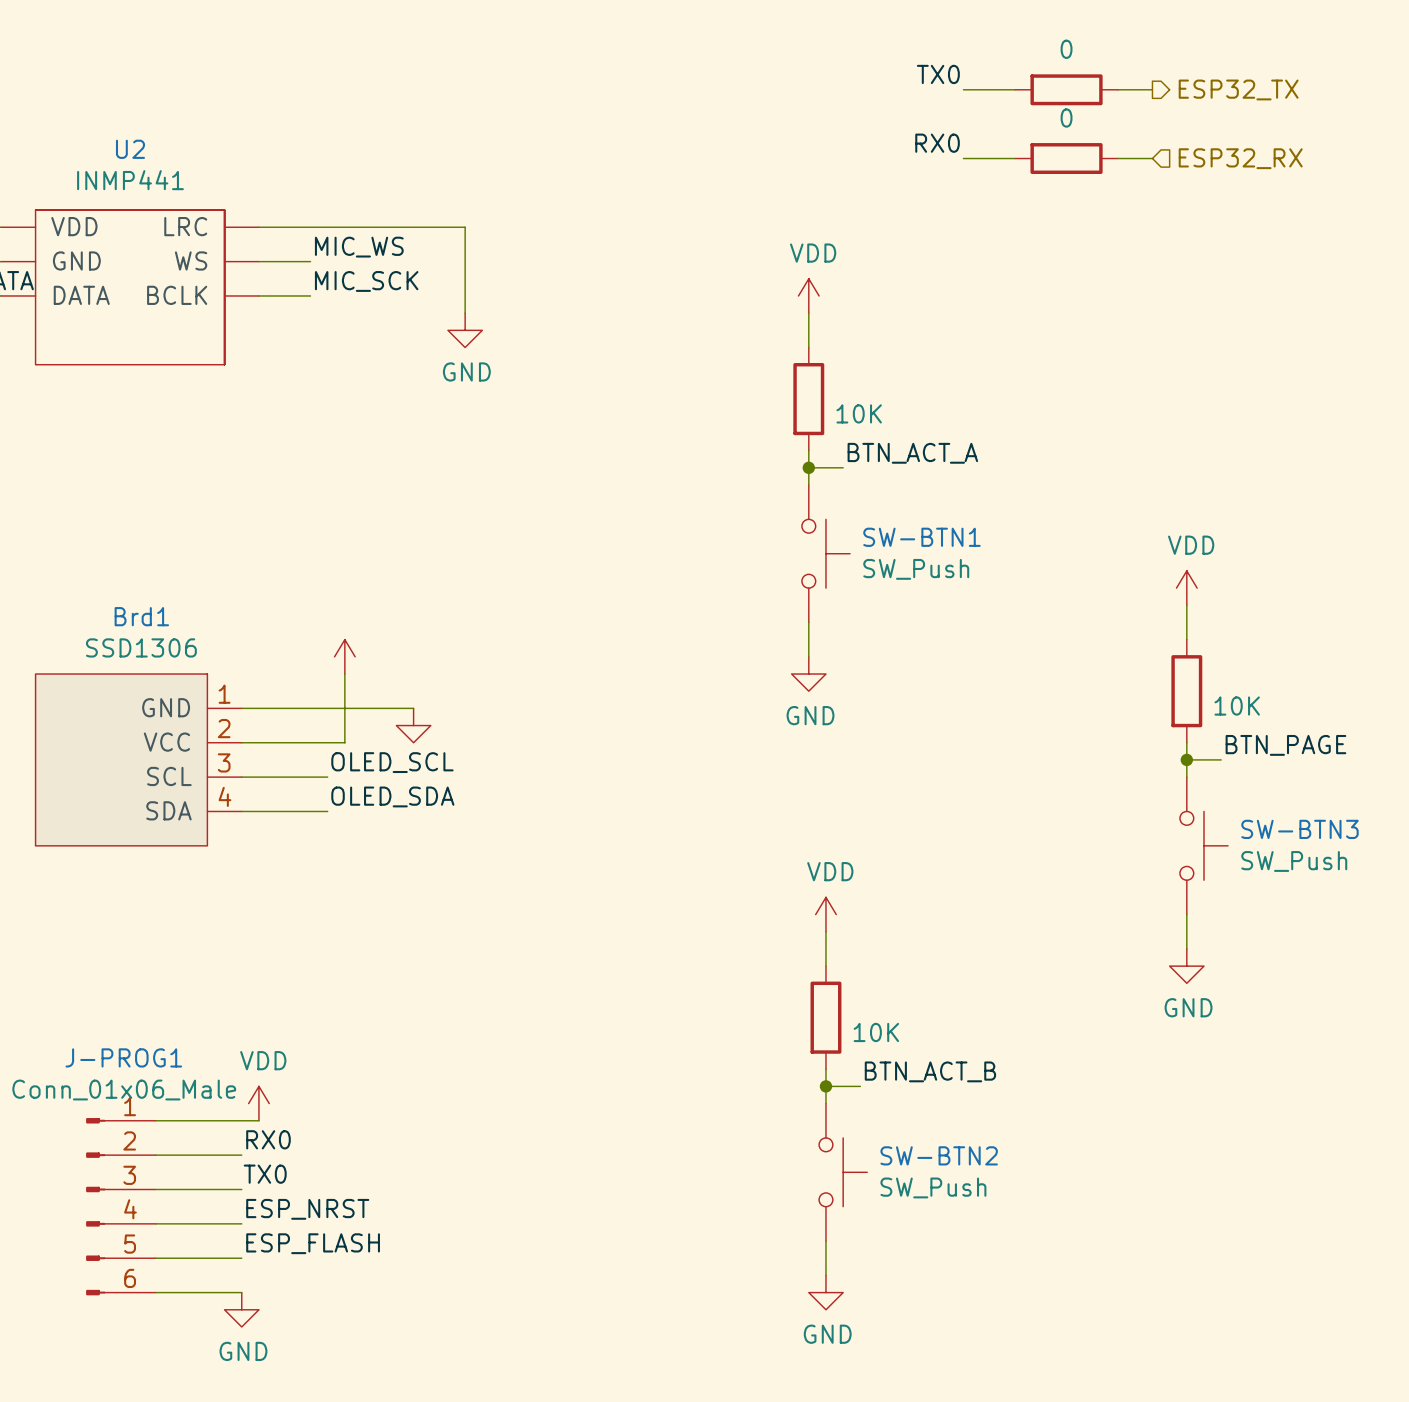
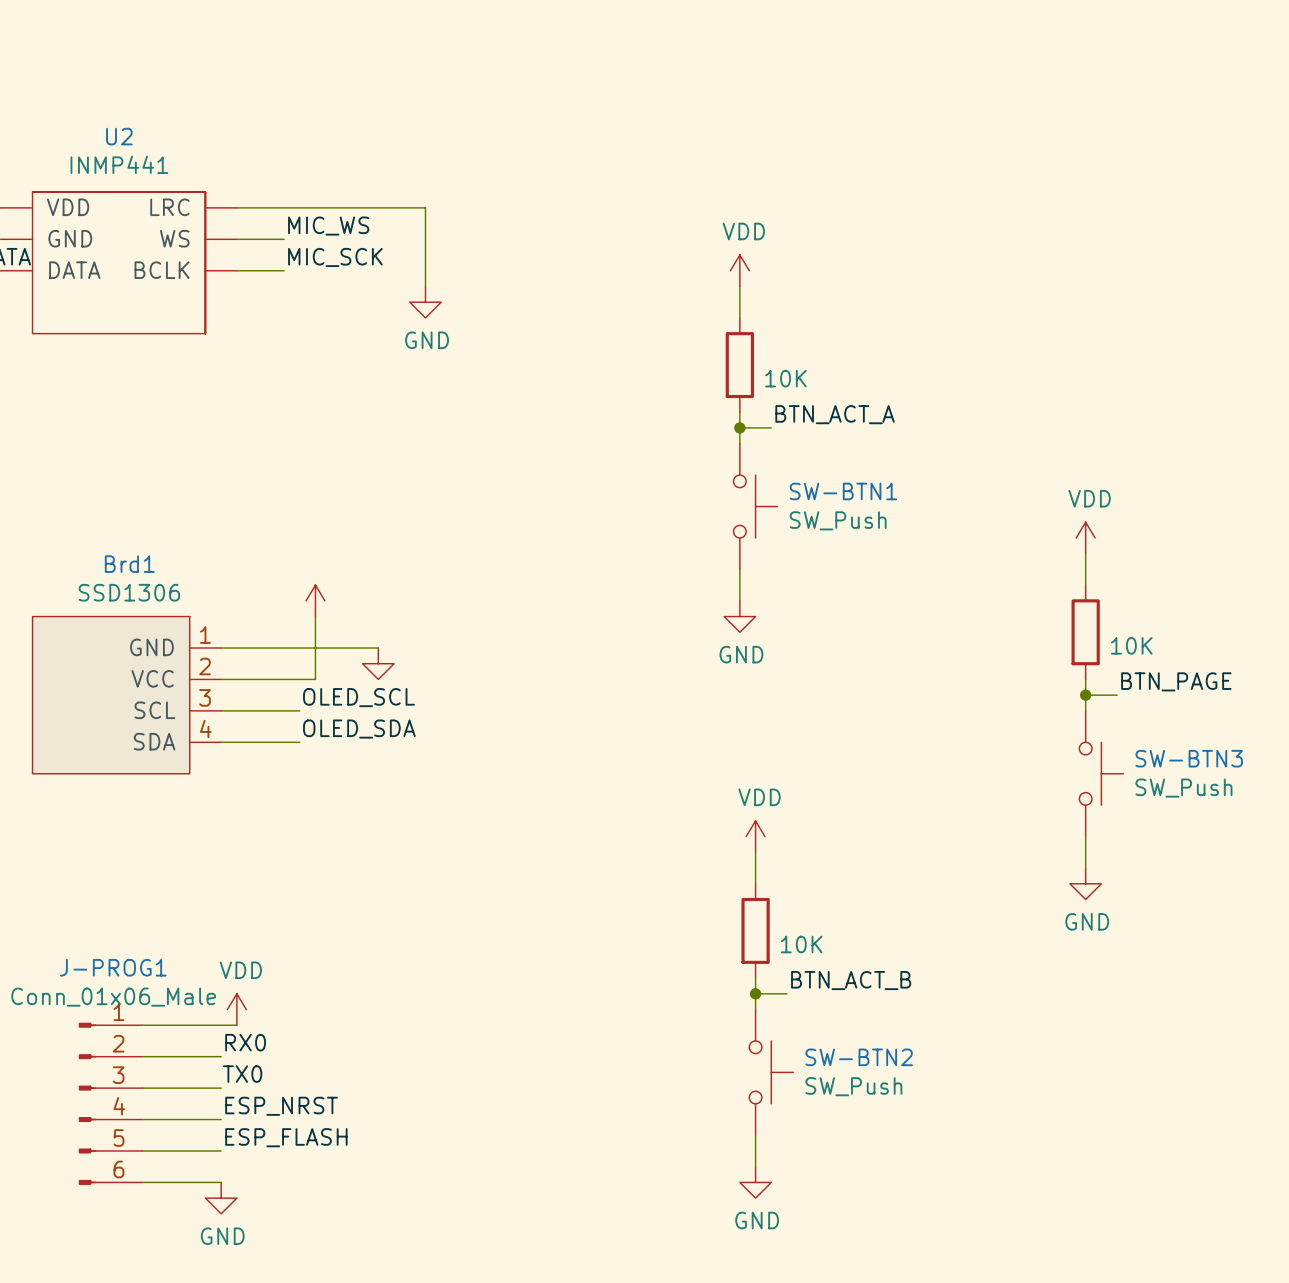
label: TX0 (938, 74) -> none
wire: (963, 89) (1014, 89) -> none
part: 0 (1066, 89) -> none
wire: (1118, 89) (1152, 89) -> none
hierarchical label: ESP32_TX (1238, 89) -> none
label: RX0 (937, 143) -> none
wire: (963, 158) (1014, 158) -> none
part: 0 (1066, 158) -> none
wire: (1118, 158) (1152, 158) -> none
hierarchical label: ESP32_RX (1240, 158) -> none

